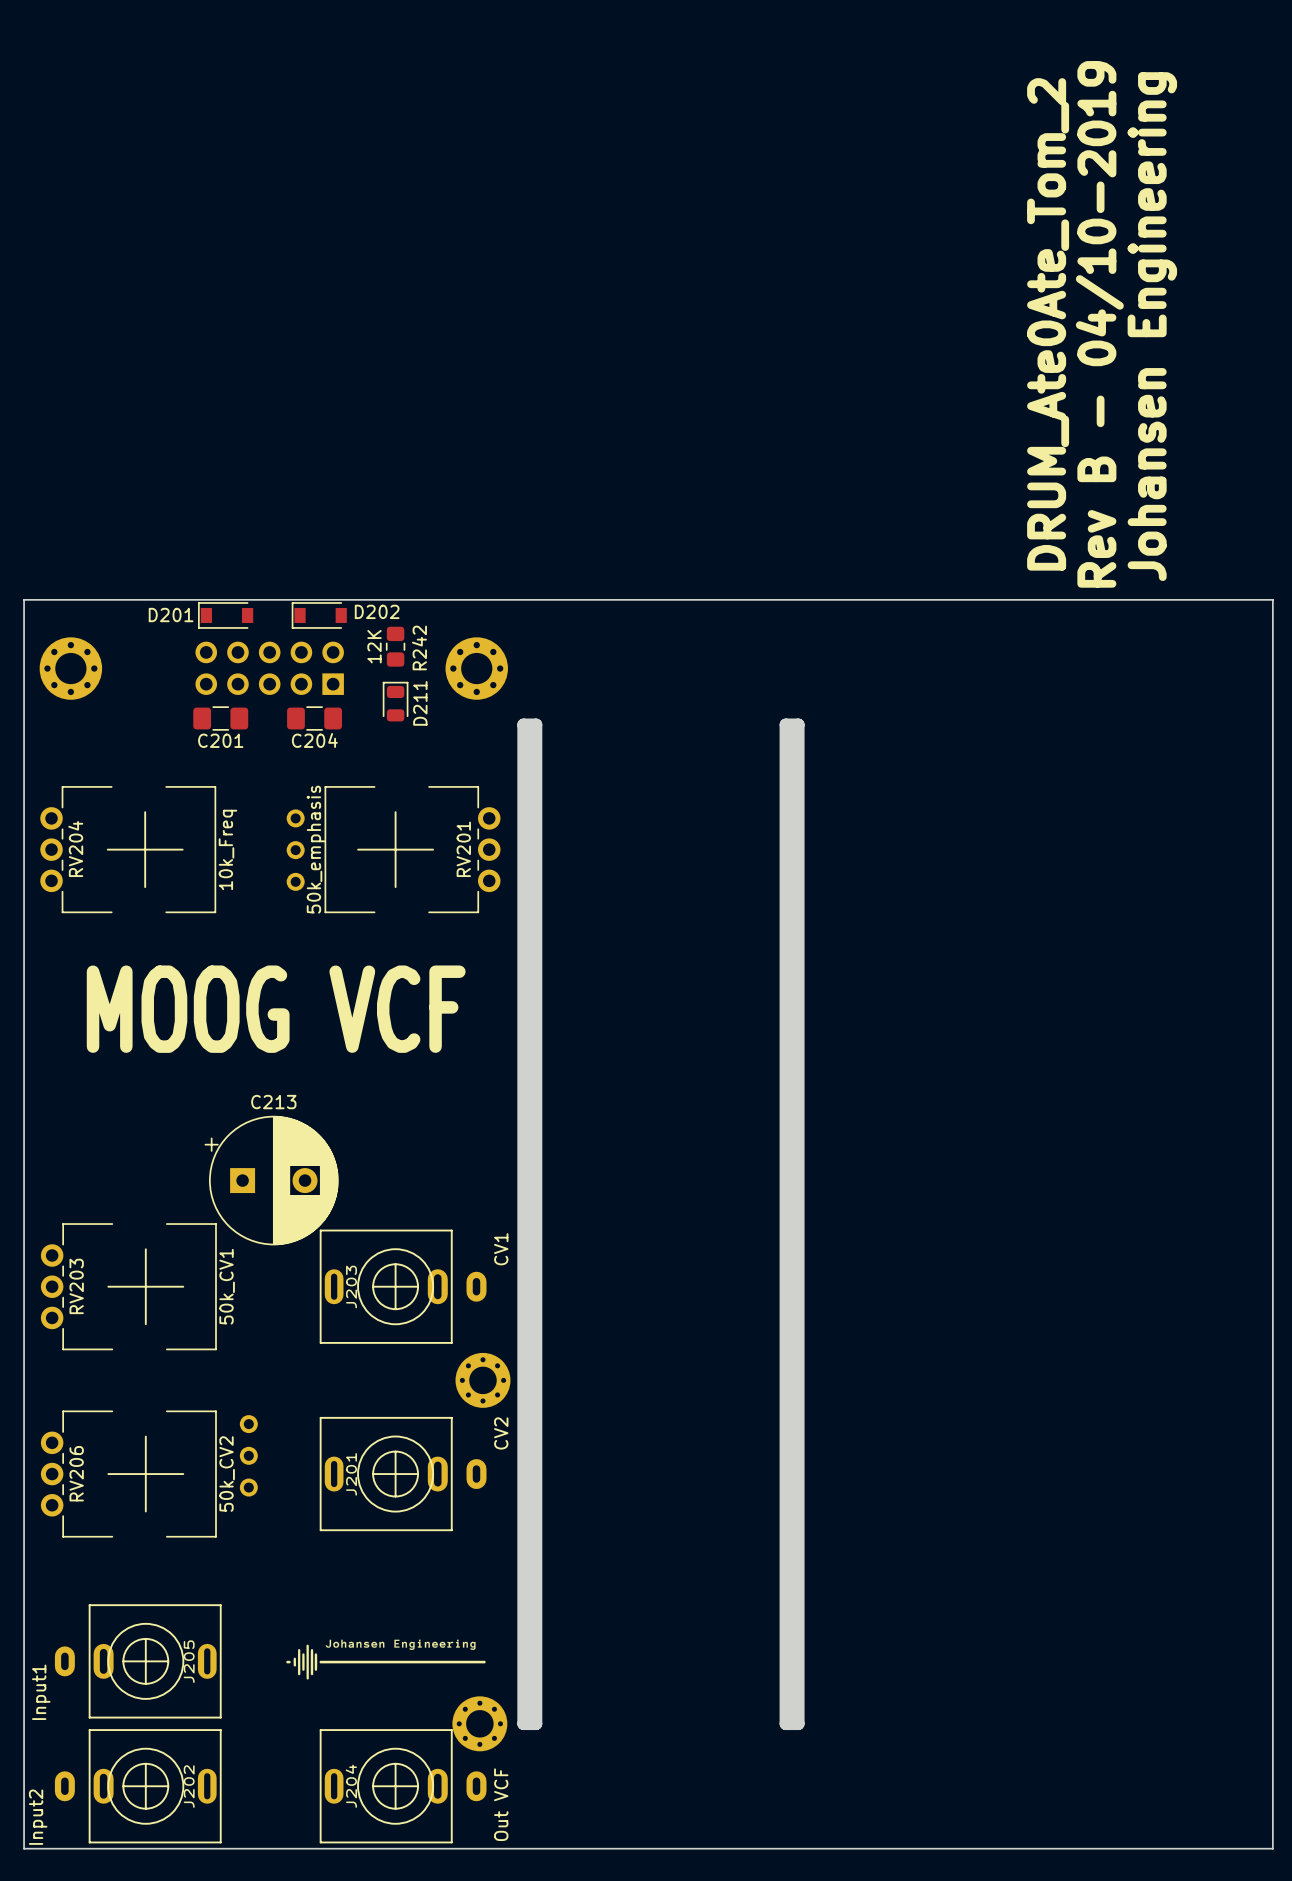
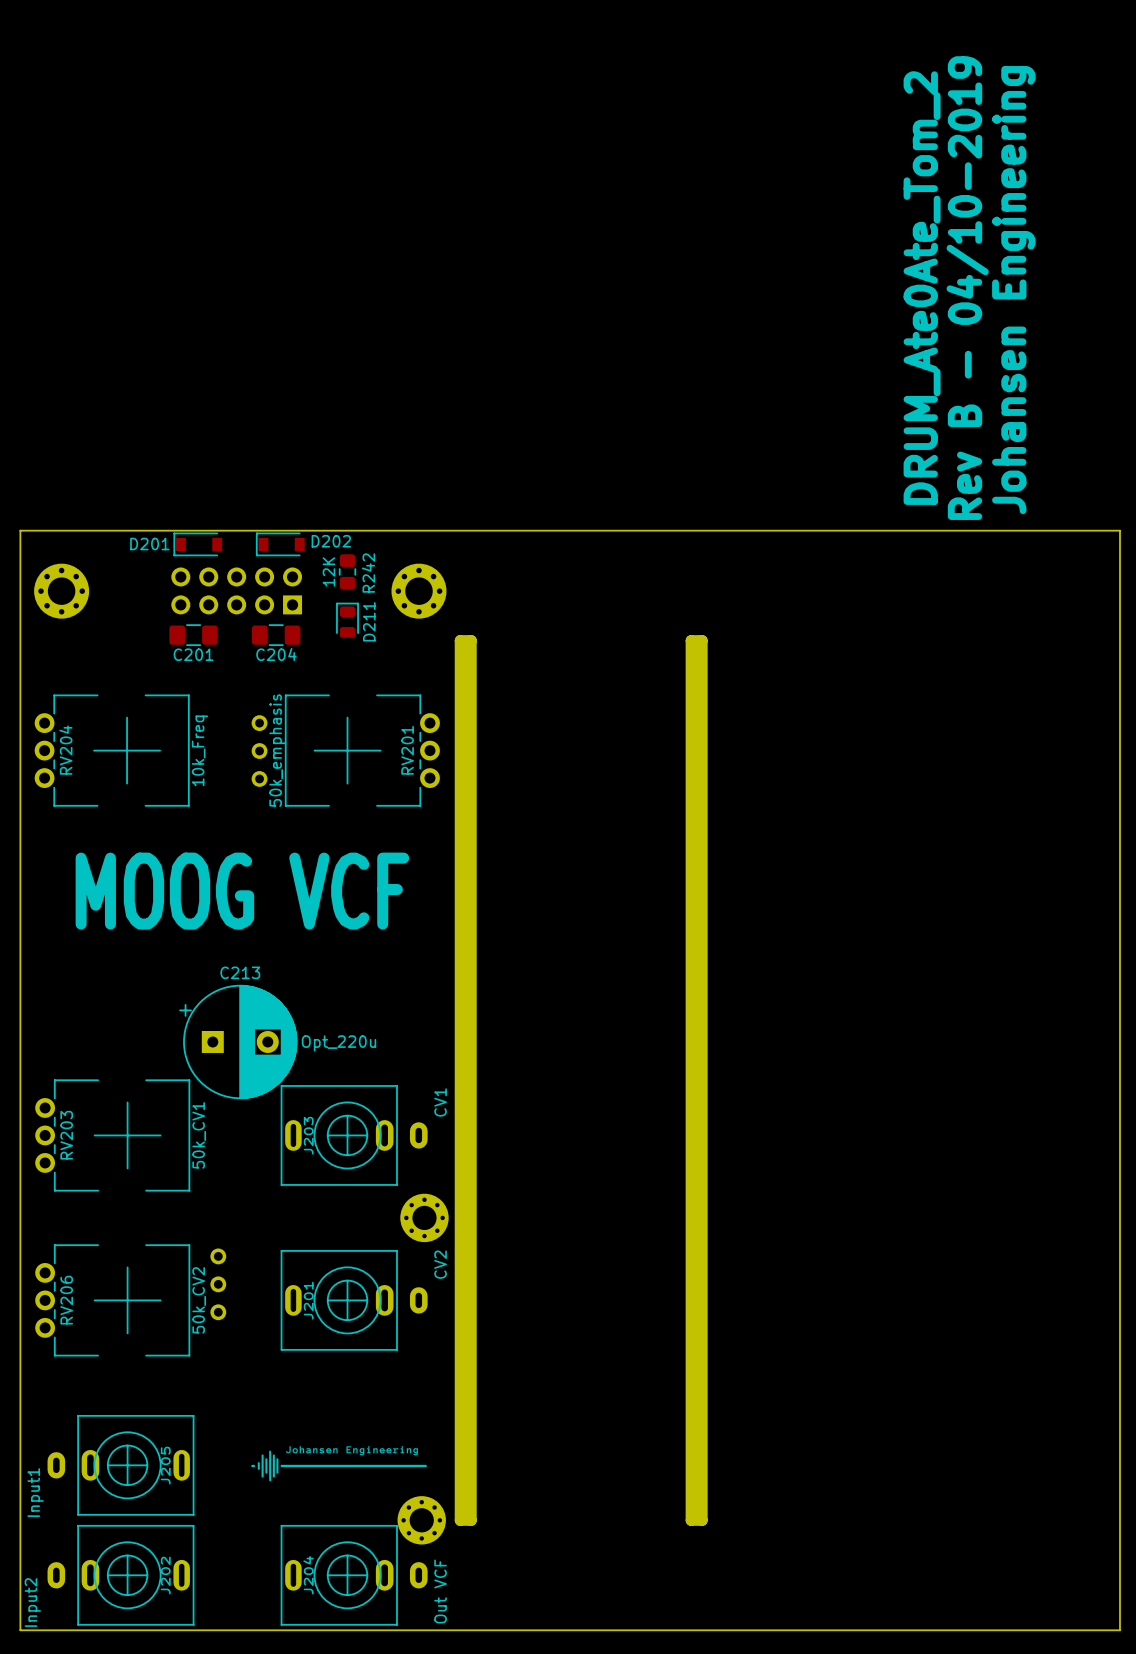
C213 value: none -> Opt_220u (339, 1043)

